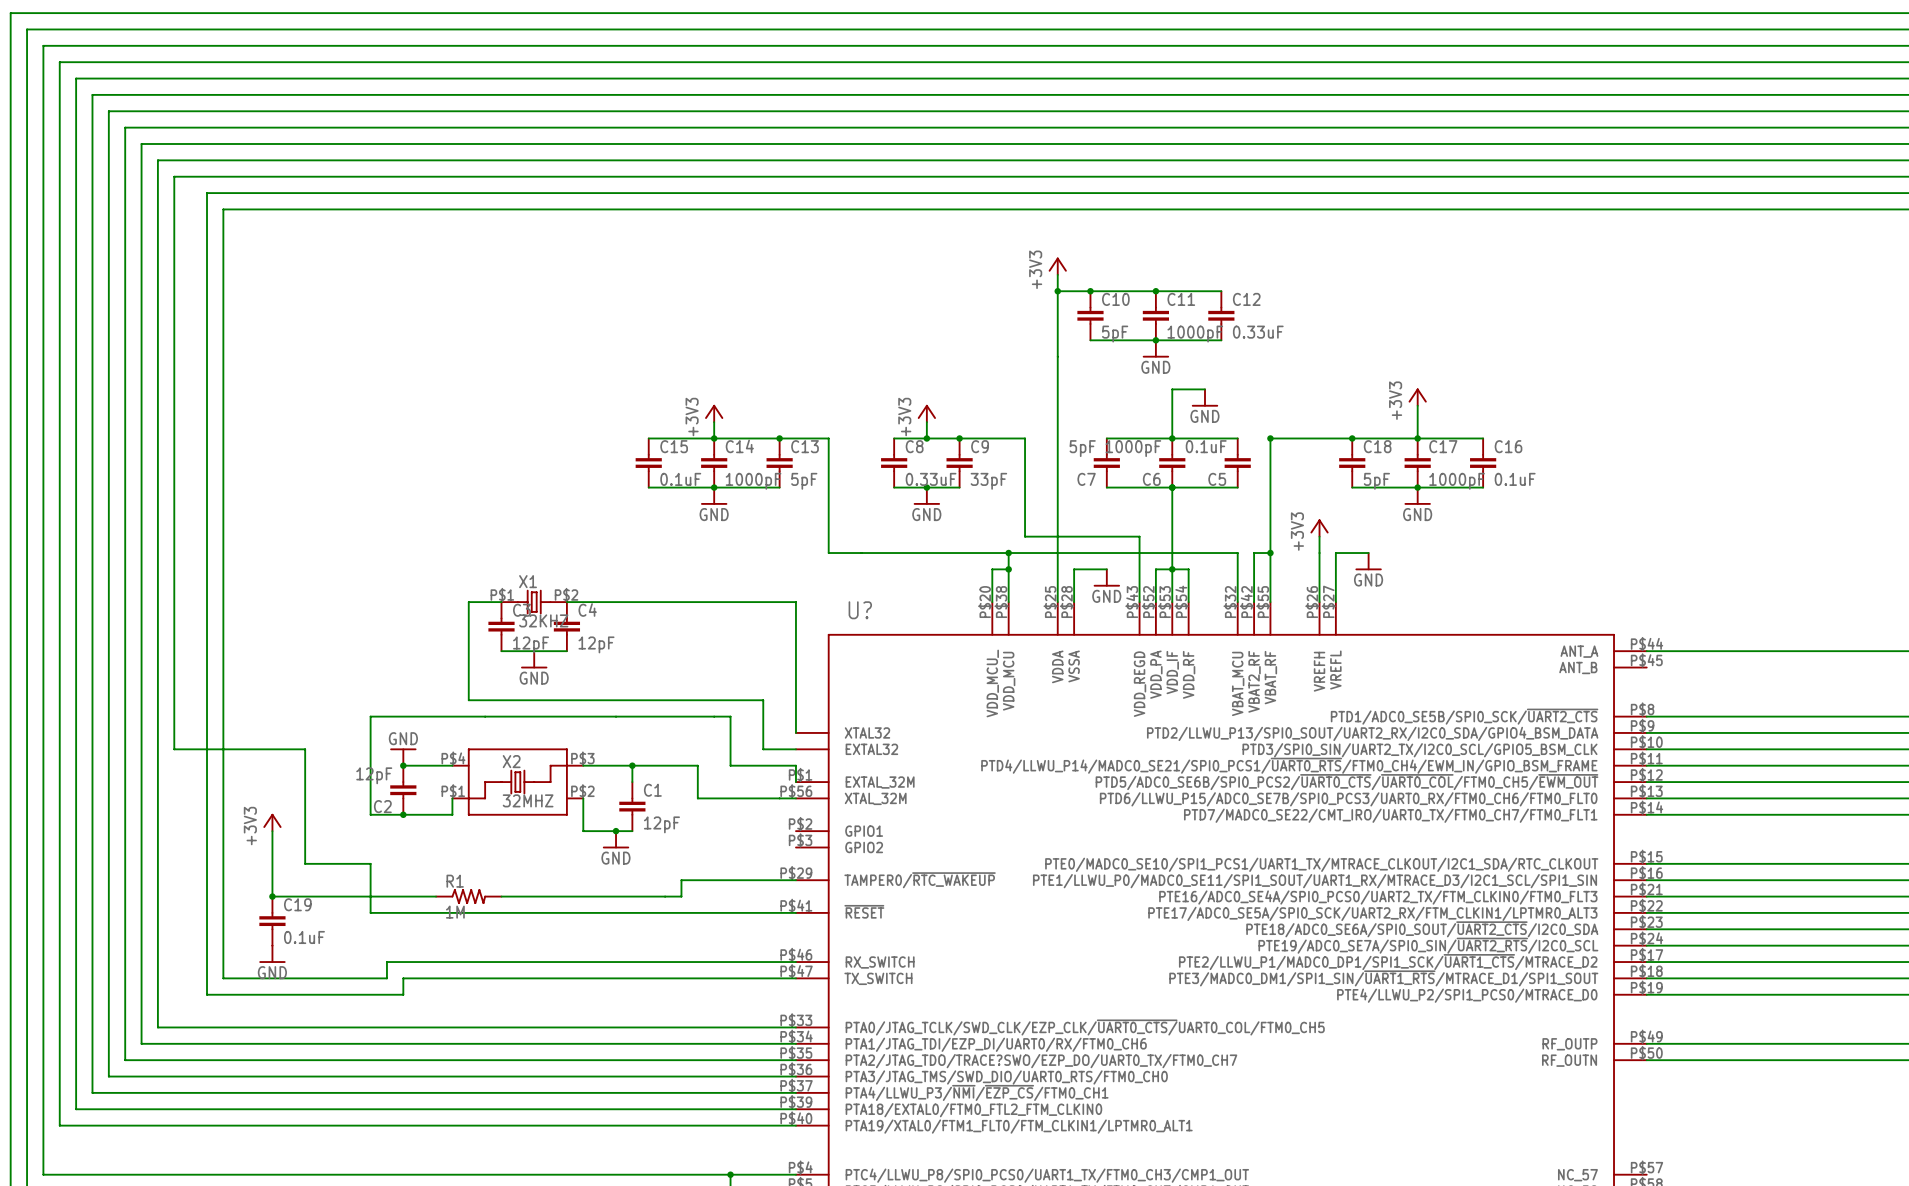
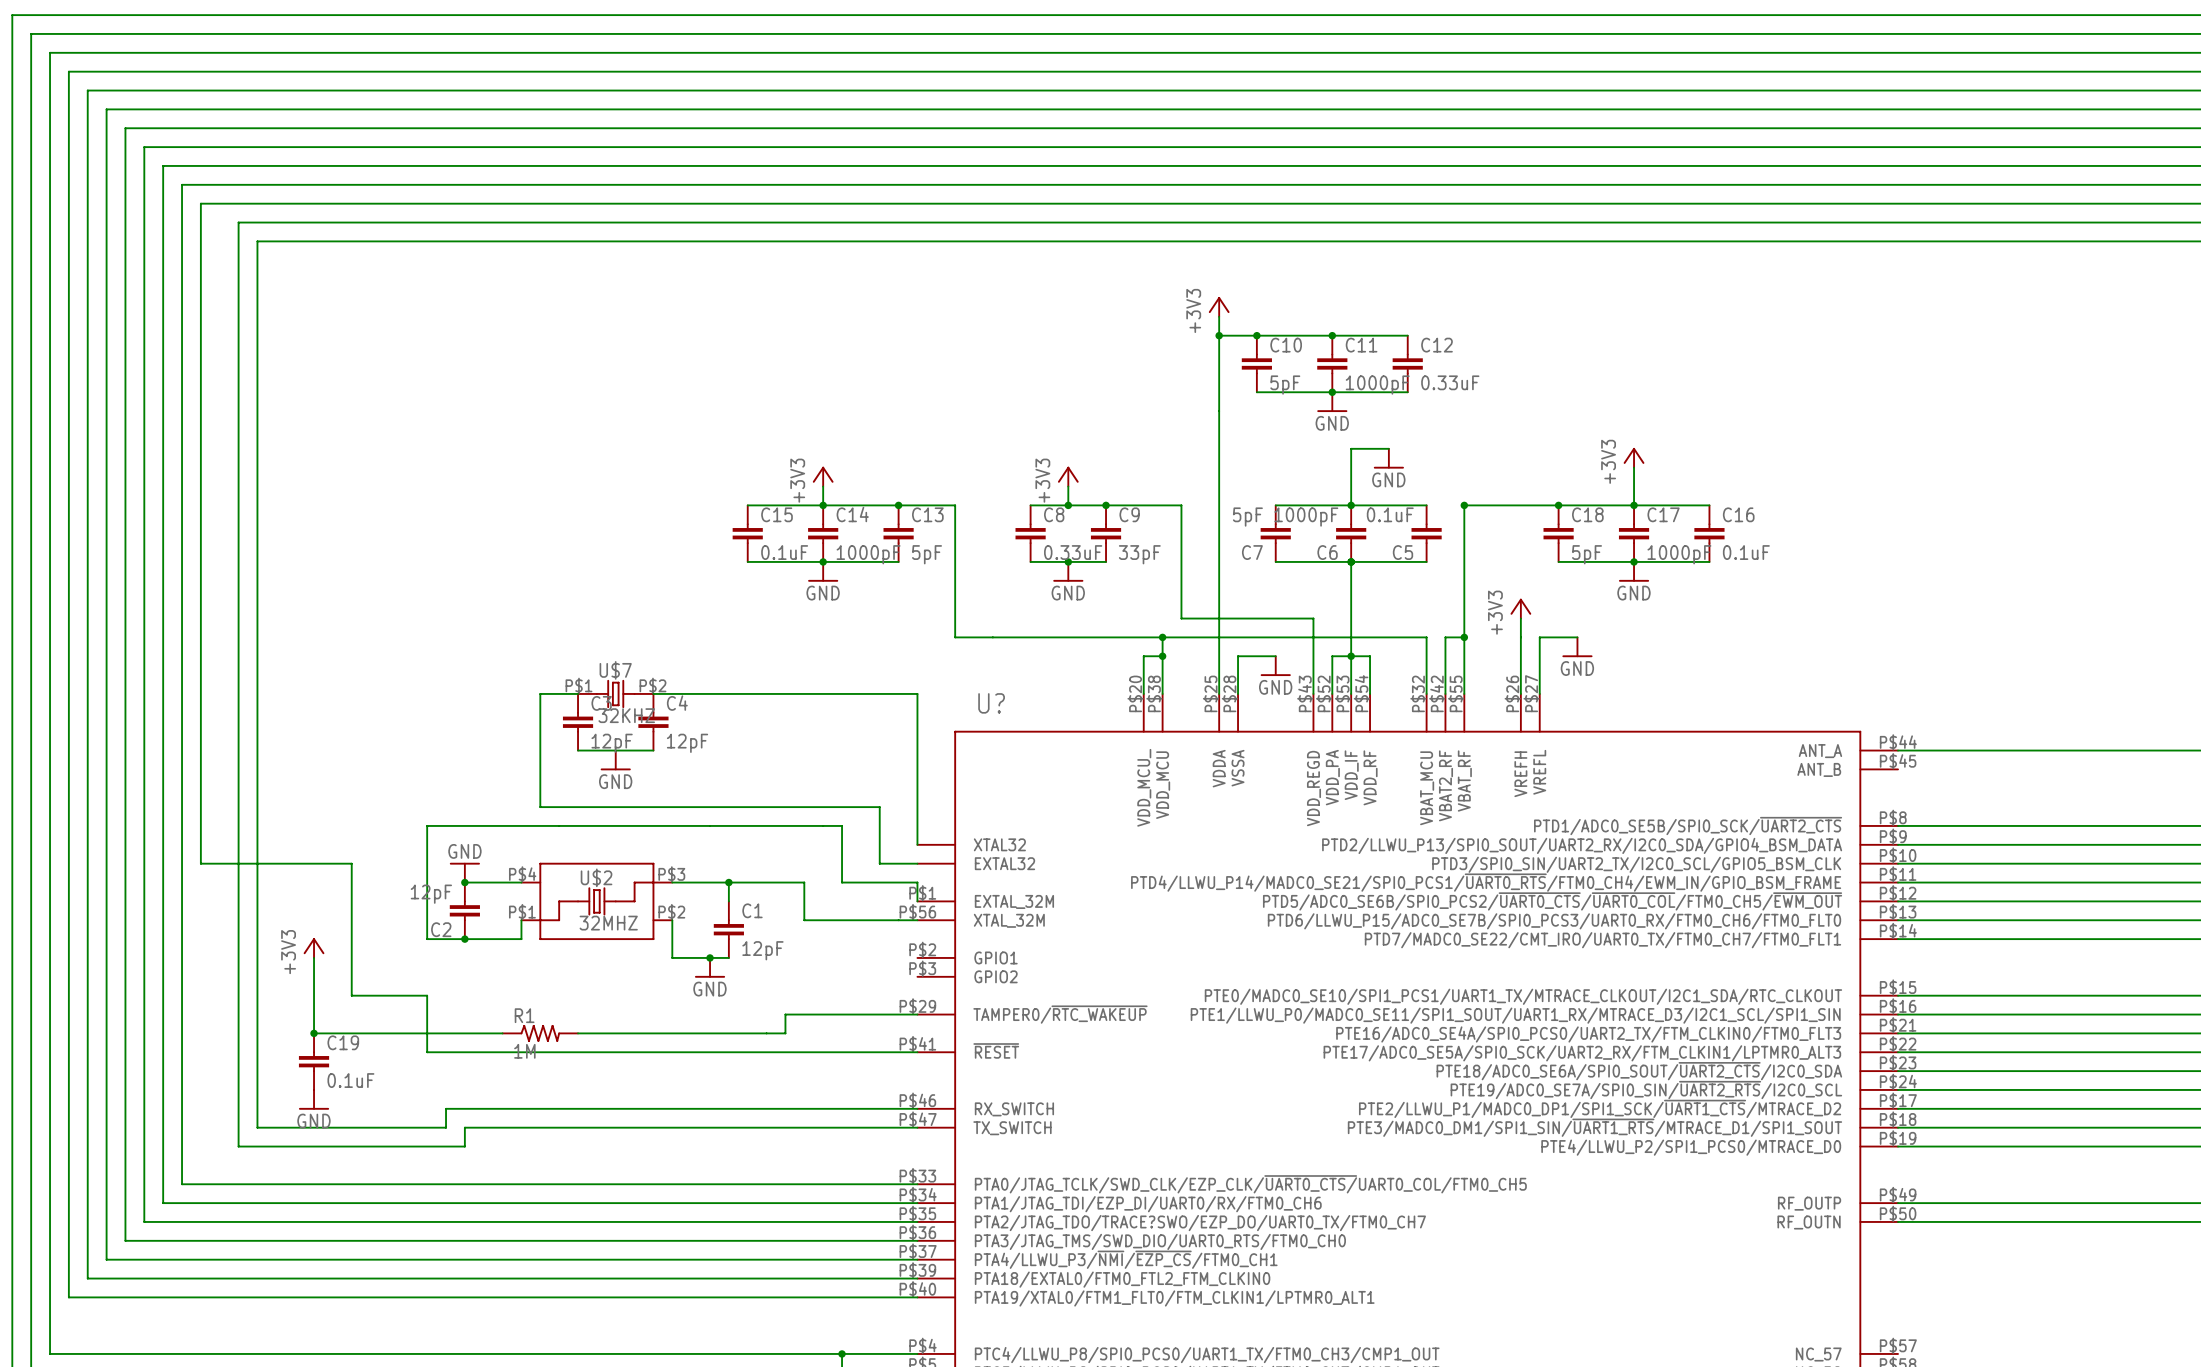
X1 name: X1 (528, 581) -> U$7 (615, 670)
X2 name: X2 (511, 761) -> U$2 (596, 877)

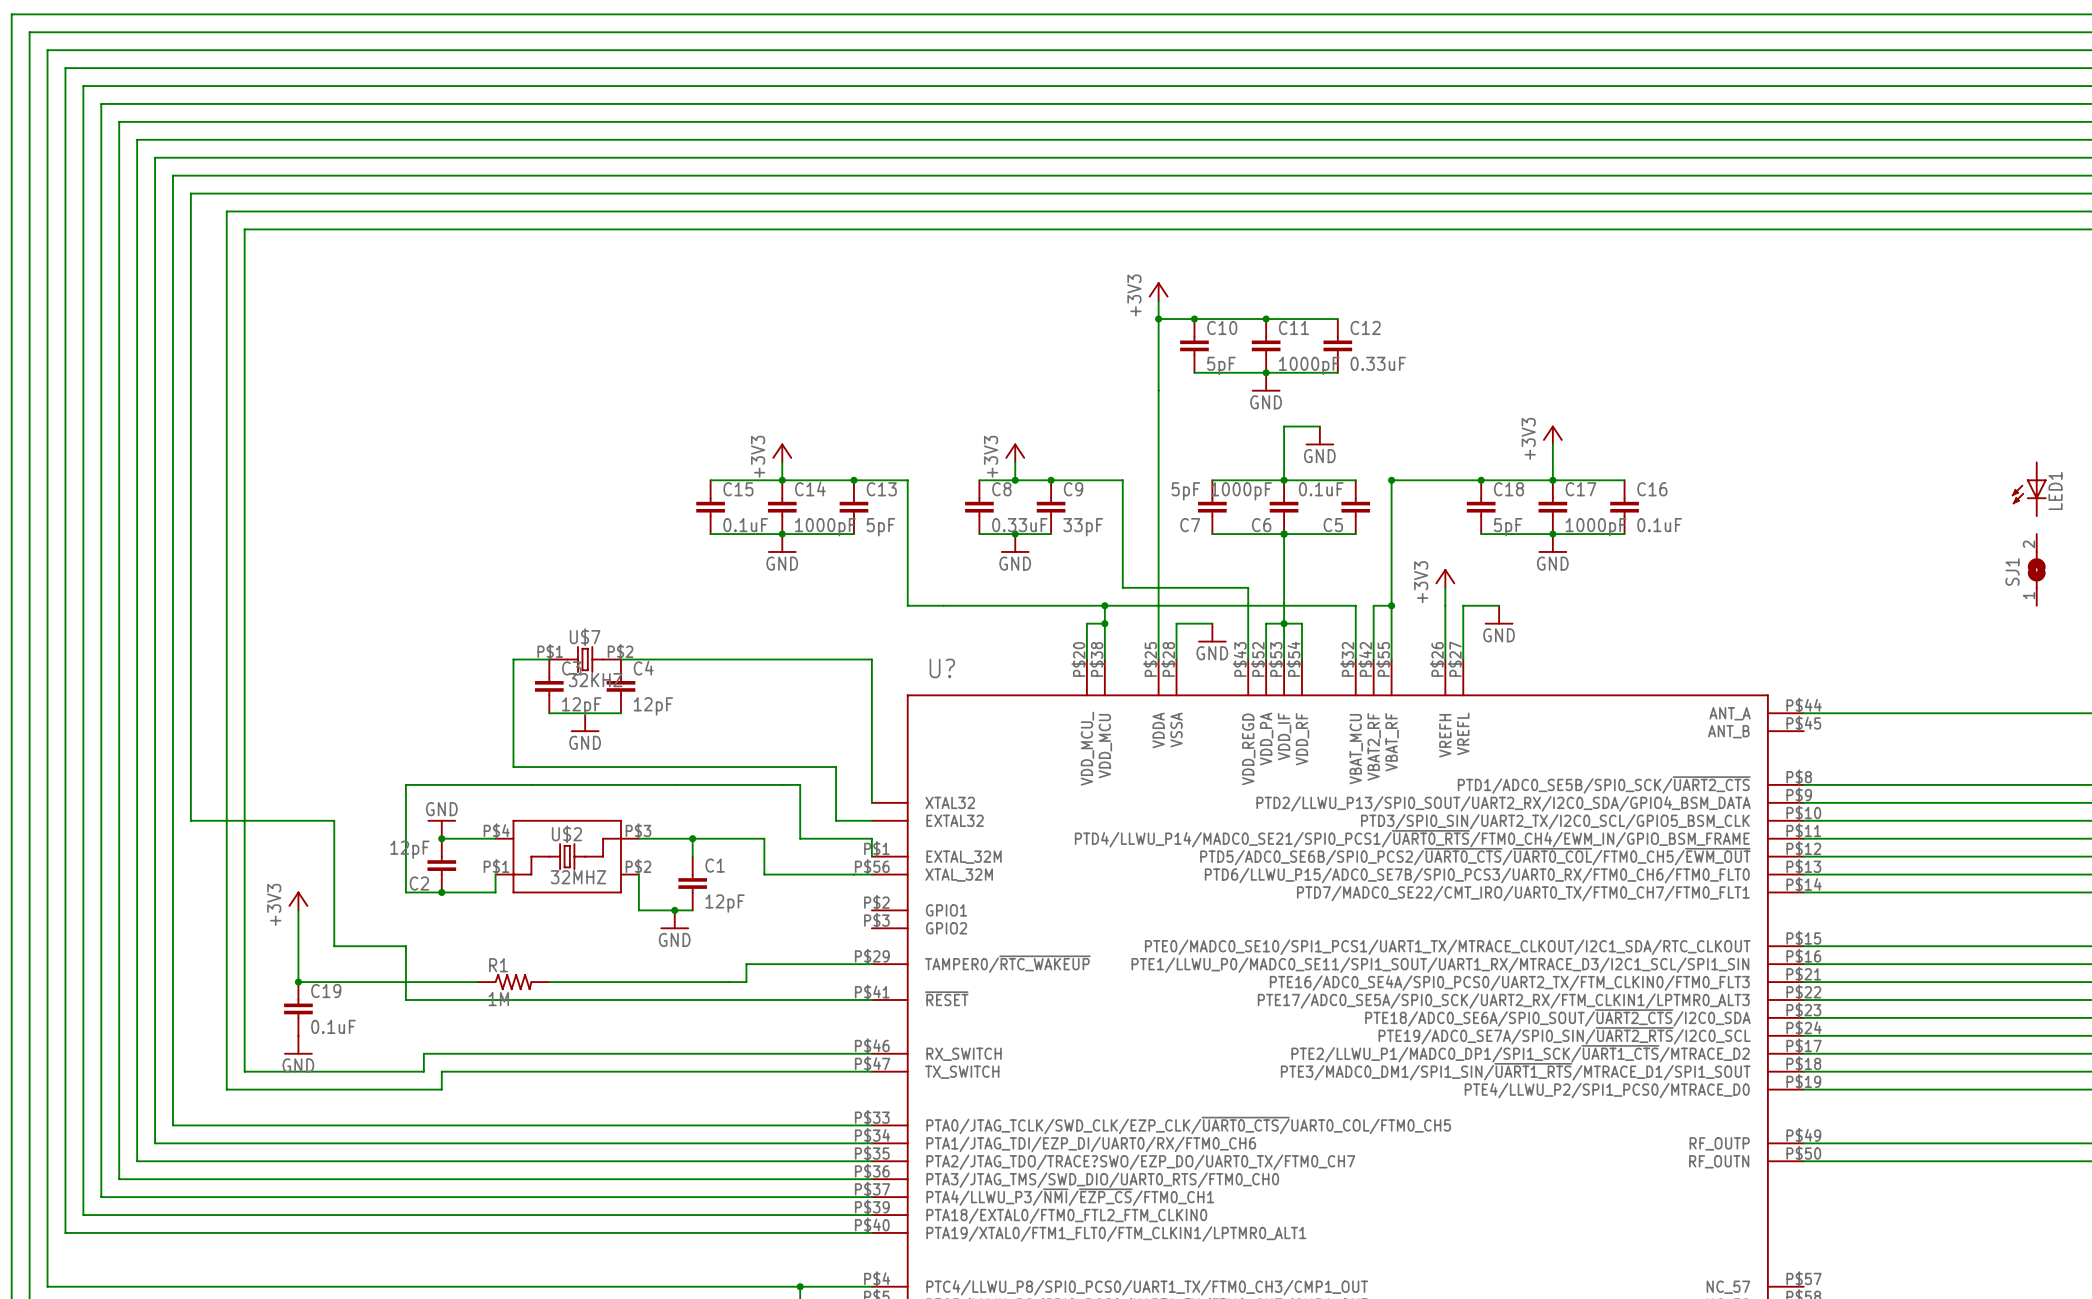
LED1: none -> (2029, 489)
SJ1: none -> (2036, 569)

